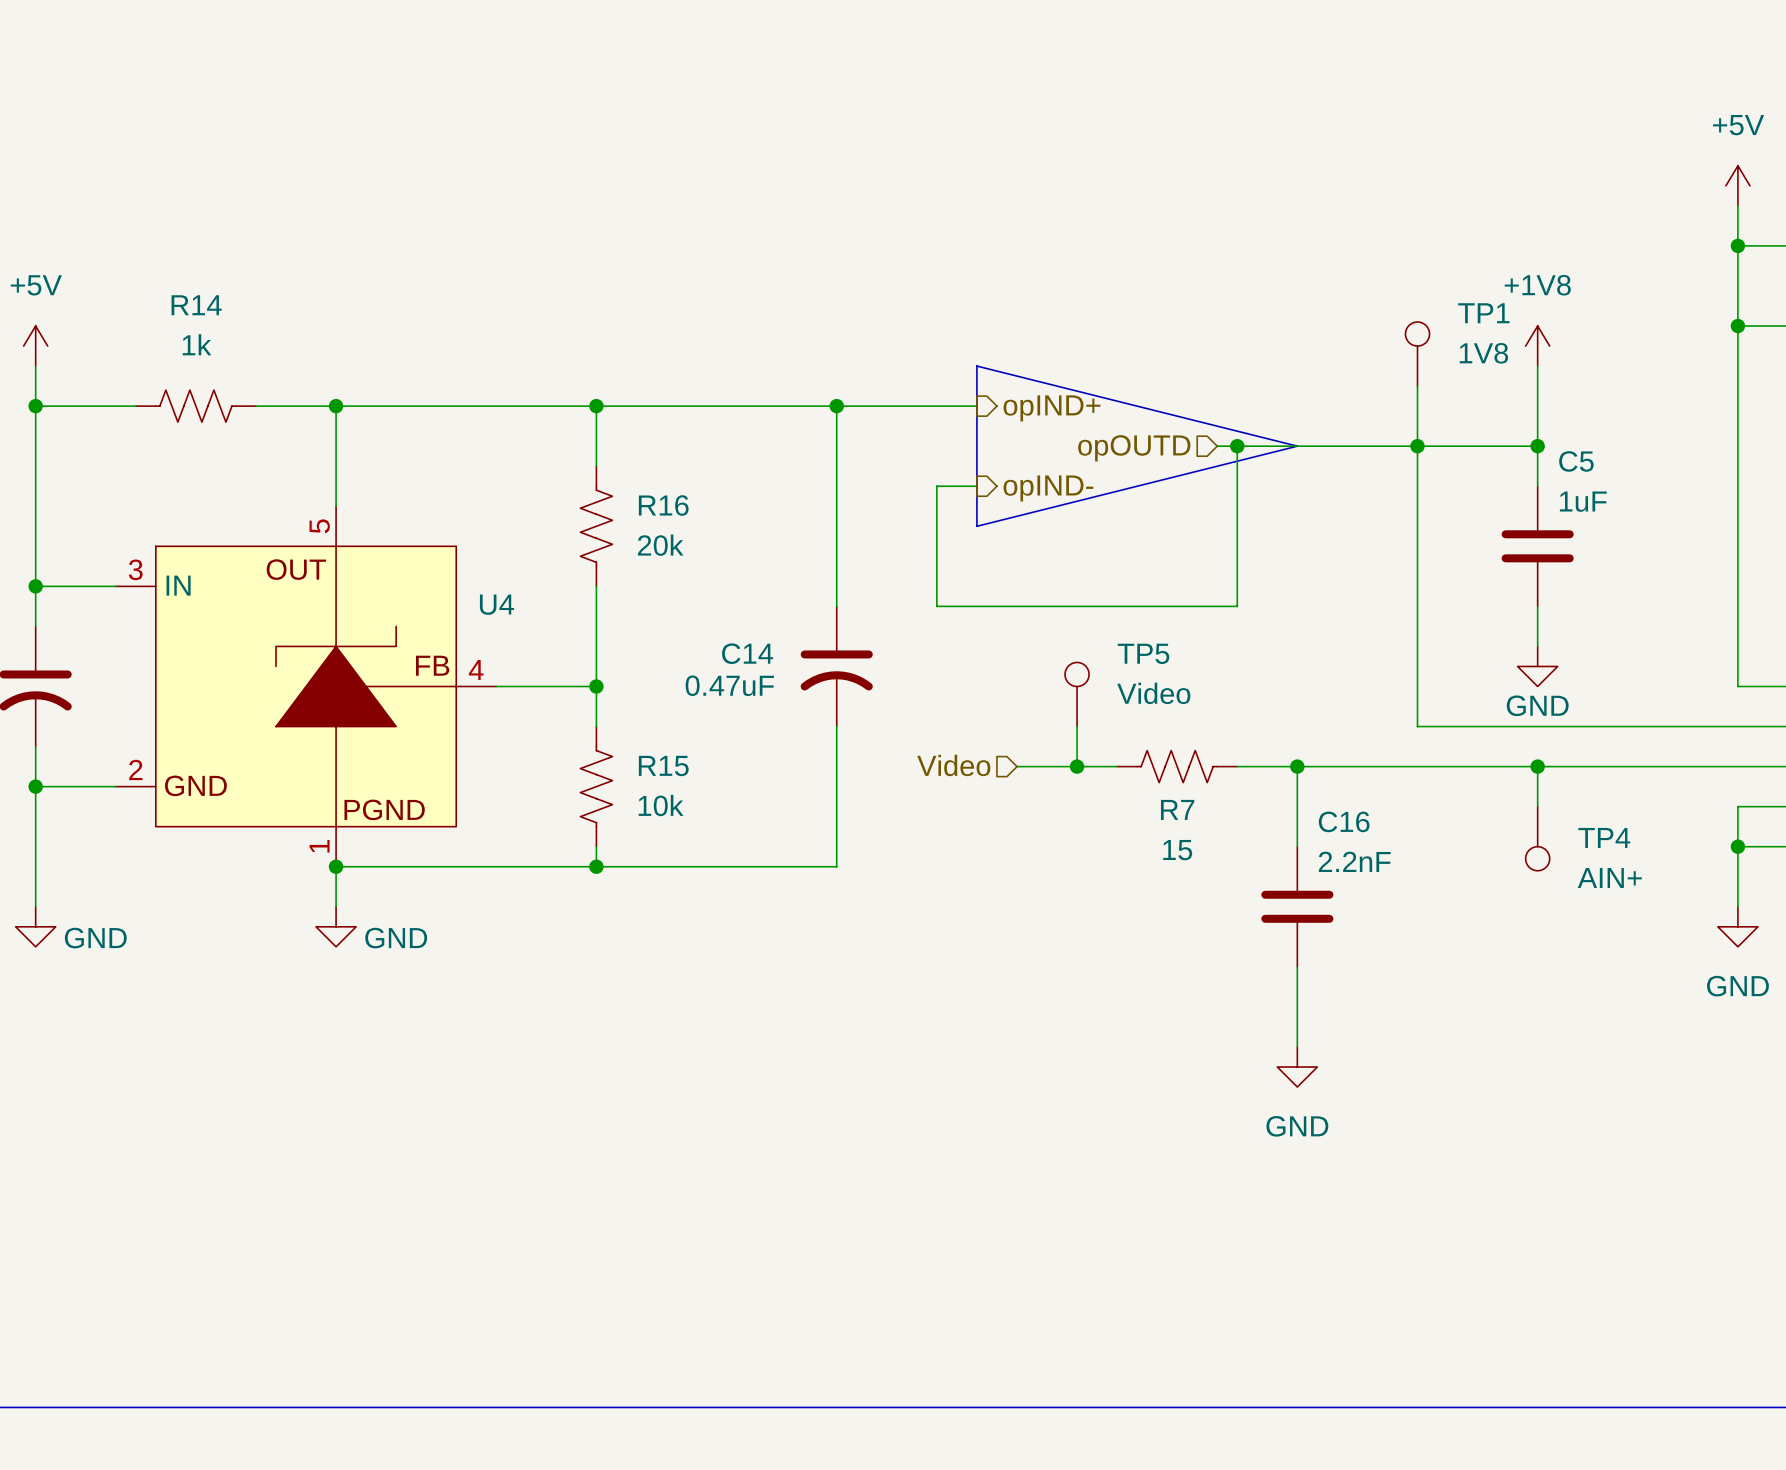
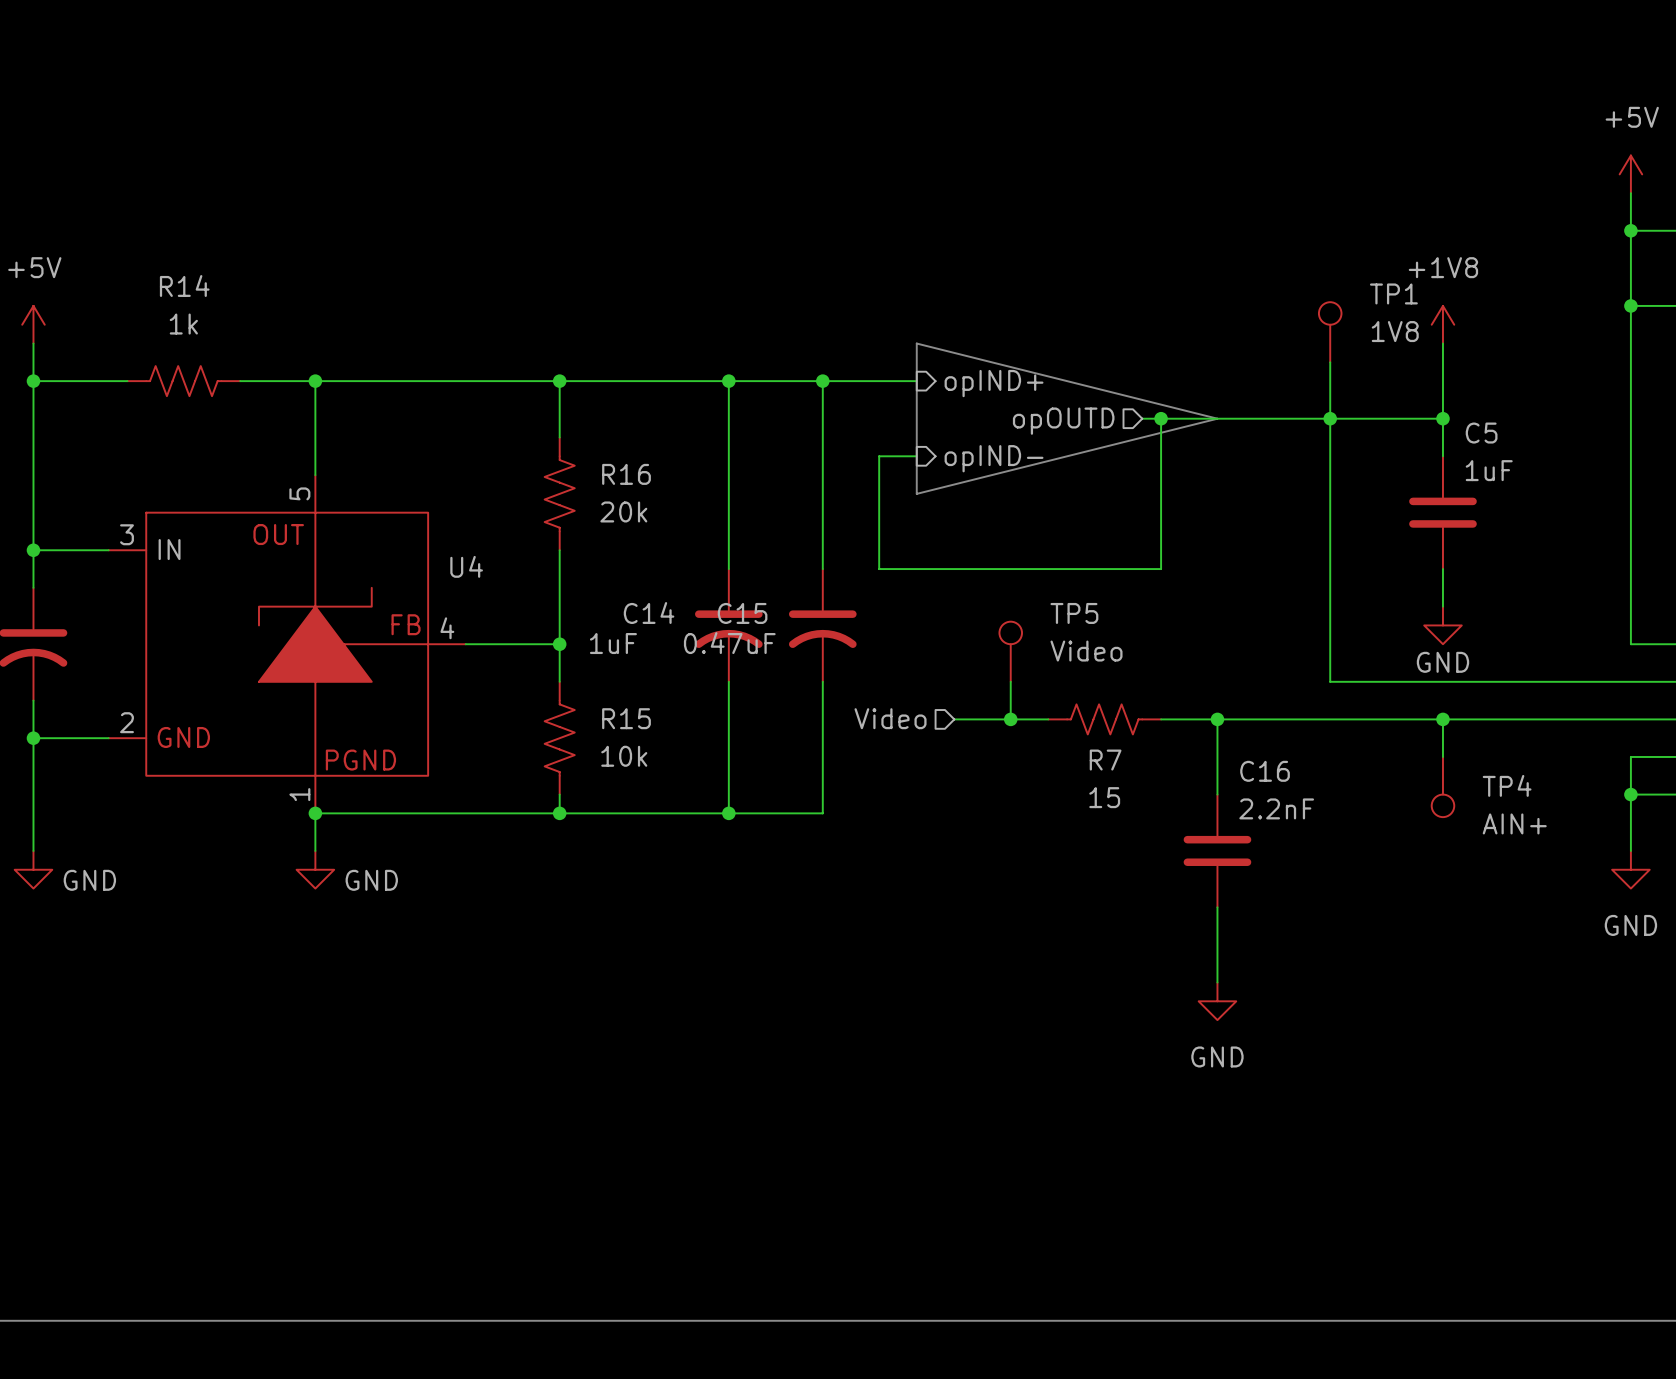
wire: none -> (728, 381) (728, 569)
junction: none -> (728, 381)
wire: (836, 406) (836, 606) -> (822, 381) (822, 569)
junction: (836, 406) -> none
junction: none -> (822, 381)
C14 position: (836, 666) -> (728, 625)
C15: none -> 0.47uF (822, 625)
C14 value: 0.47uF (729, 685) -> 1uF (613, 643)
wire: none -> (728, 681) (728, 813)
wire: (836, 726) (836, 866) -> (822, 681) (822, 813) (785, 813)
junction: none -> (728, 813)

